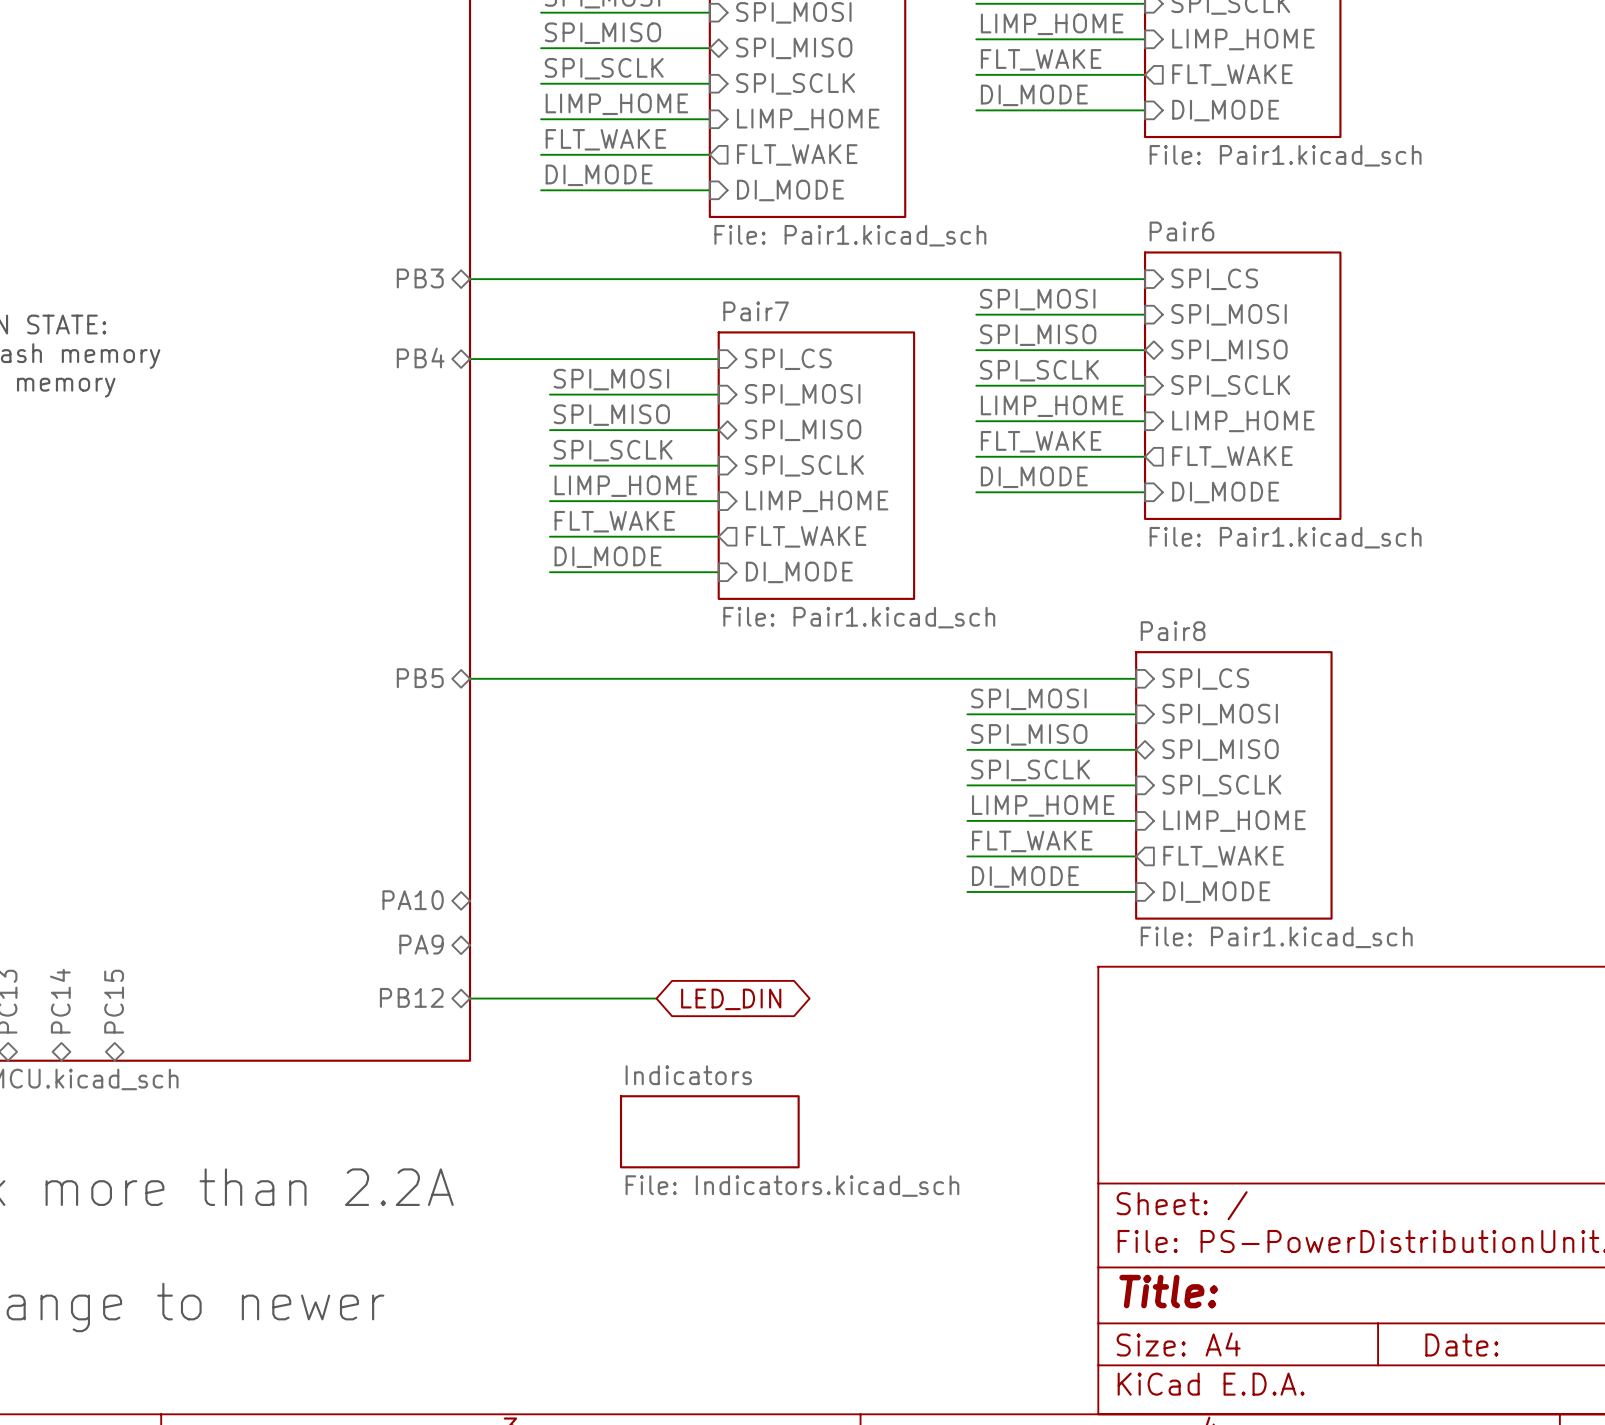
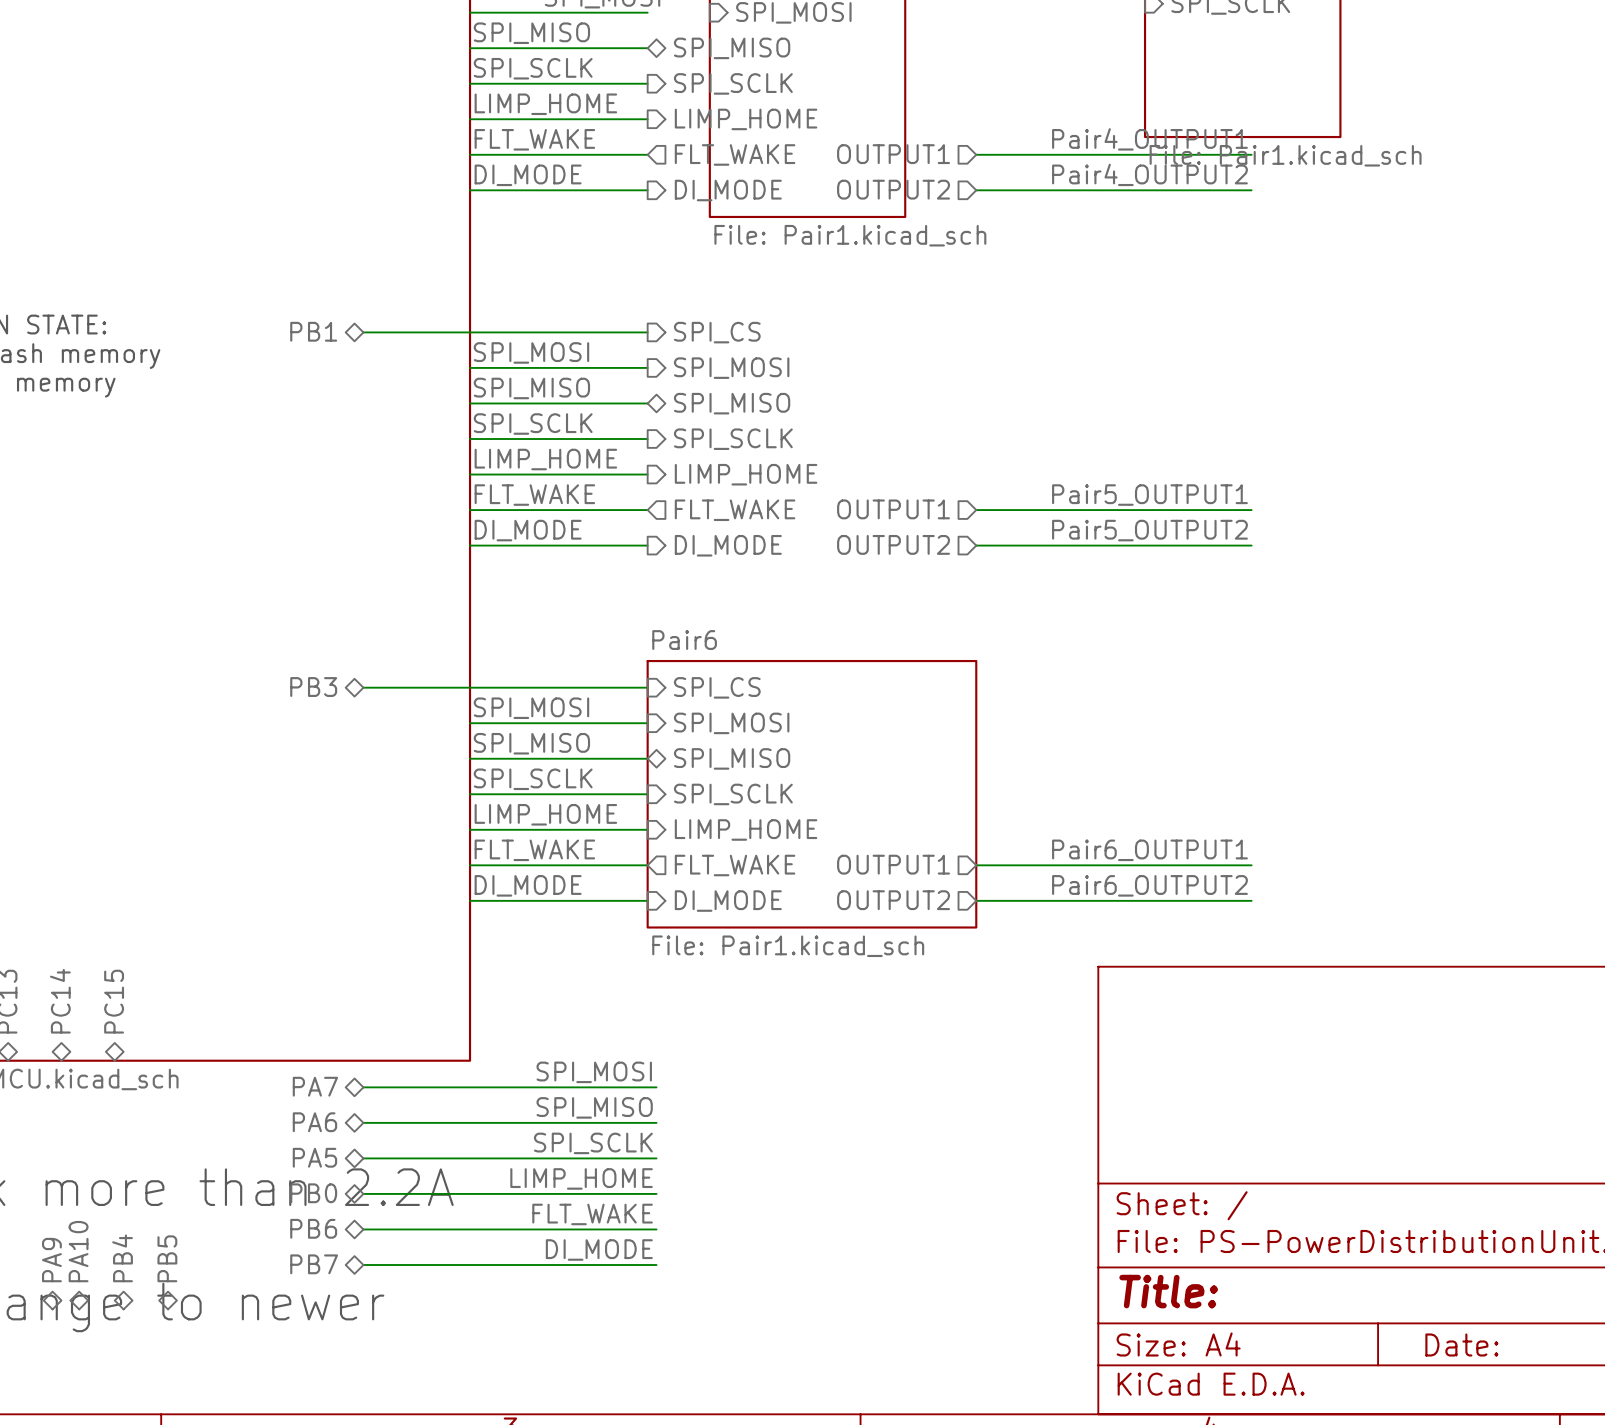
wire: (976, 3) (1145, 3) -> none
wire: none -> (470, 12) (541, 12)
wire: (647, 12) (709, 12) -> none
label: LIMP_HOME (1052, 24) -> none
label position: SPI_MISO (602, 33) -> SPI_MISO (531, 33)
wire: (976, 39) (1145, 39) -> none
sheet pin: LIMP_HOME (1243, 39) -> none
wire: none -> (470, 48) (541, 48)
wire: (647, 48) (709, 48) -> none
sheet pin position: SPI_MISO (794, 48) -> SPI_MISO (732, 48)
label: FLT_WAKE (1041, 59) -> none
label position: SPI_SCLK (604, 68) -> SPI_SCLK (533, 68)
wire: (976, 74) (1145, 74) -> none
sheet pin: FLT_WAKE (1232, 75) -> none
wire: none -> (470, 83) (541, 83)
wire: (647, 83) (709, 83) -> none
sheet pin position: SPI_SCLK (795, 83) -> SPI_SCLK (733, 83)
label: DI_MODE (1034, 95) -> none
label position: LIMP_HOME (616, 104) -> LIMP_HOME (545, 104)
wire: (976, 110) (1145, 110) -> none
sheet pin: DI_MODE (1225, 110) -> none
wire: none -> (470, 119) (541, 119)
wire: (647, 119) (709, 119) -> none
sheet pin position: LIMP_HOME (808, 119) -> LIMP_HOME (746, 119)
label position: FLT_WAKE (605, 139) -> FLT_WAKE (534, 139)
label: none -> Pair4_OUTPUT1 (1149, 139)
wire: none -> (470, 154) (541, 154)
wire: (647, 154) (709, 154) -> none
sheet pin position: FLT_WAKE (797, 154) -> FLT_WAKE (735, 154)
sheet pin: none -> OUTPUT1 (893, 154)
wire: none -> (976, 154) (1251, 154)
label: none -> Pair4_OUTPUT2 (1149, 174)
label position: DI_MODE (599, 175) -> DI_MODE (528, 175)
sheet pin: none -> OUTPUT2 (893, 189)
wire: none -> (470, 190) (541, 190)
wire: (647, 190) (709, 190) -> none
sheet pin position: DI_MODE (790, 190) -> DI_MODE (728, 190)
wire: none -> (976, 190) (1251, 190)
sheet Pair6 name position: Pair6 (1181, 231) -> Pair6 (684, 640)
sheet Pair6 shape: [1143, 251, 1342, 521] -> [646, 659, 978, 929]
sheet pin: PB3 (420, 278) -> none
wire: (470, 279) (1145, 279) -> none
sheet pin: SPI_CS (1214, 279) -> none
label: SPI_MOSI (1037, 299) -> none
wire: (976, 314) (1145, 314) -> none
sheet pin: SPI_MOSI (1229, 314) -> none
sheet pin: none -> PB1 (313, 331)
wire: none -> (363, 332) (647, 332)
label: SPI_MISO (1038, 335) -> none
wire: (976, 350) (1145, 350) -> none
sheet pin: SPI_MISO (1229, 350) -> none
sheet pin: PB4 (420, 357) -> none
wire: (470, 359) (718, 359) -> none
sheet pin position: SPI_CS (788, 359) -> SPI_CS (717, 332)
wire: none -> (470, 367) (647, 367)
label: SPI_SCLK (1039, 370) -> none
label position: SPI_MOSI (611, 379) -> SPI_MOSI (531, 352)
wire: (976, 385) (1145, 385) -> none
sheet pin: SPI_SCLK (1230, 385) -> none
wire: (549, 394) (718, 394) -> none
sheet pin position: SPI_MOSI (802, 394) -> SPI_MOSI (731, 368)
wire: none -> (470, 403) (647, 403)
label: LIMP_HOME (1052, 406) -> none
label position: SPI_MISO (611, 415) -> SPI_MISO (531, 388)
wire: (976, 421) (1145, 421) -> none
sheet pin: LIMP_HOME (1243, 421) -> none
wire: (549, 430) (718, 430) -> none
sheet pin position: SPI_MISO (803, 430) -> SPI_MISO (732, 403)
wire: none -> (470, 439) (647, 439)
label: FLT_WAKE (1041, 441) -> none
label position: SPI_SCLK (613, 450) -> SPI_SCLK (533, 423)
wire: (976, 456) (1145, 456) -> none
sheet pin: FLT_WAKE (1232, 456) -> none
wire: (549, 465) (718, 465) -> none
sheet pin position: SPI_SCLK (804, 465) -> SPI_SCLK (733, 439)
sheet Pair7: File: Pair1.kicad_sch (816, 465) -> none
wire: none -> (470, 474) (647, 474)
label: DI_MODE (1034, 477) -> none
label position: LIMP_HOME (625, 486) -> LIMP_HOME (545, 459)
wire: (976, 492) (1145, 492) -> none
sheet pin: DI_MODE (1225, 492) -> none
label: none -> Pair5_OUTPUT1 (1149, 495)
wire: (549, 501) (718, 501) -> none
sheet pin position: LIMP_HOME (817, 501) -> LIMP_HOME (746, 474)
sheet pin: none -> OUTPUT1 (893, 509)
wire: none -> (470, 510) (647, 510)
wire: none -> (976, 510) (1251, 510)
label position: FLT_WAKE (614, 521) -> FLT_WAKE (534, 495)
label: none -> Pair5_OUTPUT2 (1149, 530)
wire: (549, 536) (718, 536) -> none
sheet pin position: FLT_WAKE (806, 536) -> FLT_WAKE (735, 510)
sheet Pair6 value position: File: Pair1.kicad_sch (1285, 537) -> File: Pair1.kicad_sch (788, 946)
sheet pin: none -> OUTPUT2 (893, 544)
wire: none -> (470, 545) (647, 545)
wire: none -> (976, 545) (1251, 545)
label position: DI_MODE (608, 557) -> DI_MODE (528, 530)
wire: (549, 572) (718, 572) -> none
sheet pin position: DI_MODE (799, 572) -> DI_MODE (728, 545)
sheet pin: PB5 (420, 678) -> none
wire: (470, 678) (1136, 678) -> none
sheet pin: SPI_CS (1205, 678) -> none
sheet pin: none -> PB3 (313, 687)
wire: none -> (363, 687) (647, 687)
sheet pin: none -> SPI_CS (717, 687)
label: SPI_MOSI (1028, 699) -> none
label: none -> SPI_MOSI (531, 708)
wire: (967, 714) (1136, 714) -> none
sheet pin: SPI_MOSI (1220, 714) -> none
wire: none -> (470, 723) (647, 723)
sheet pin: none -> SPI_MOSI (731, 723)
label: SPI_MISO (1029, 734) -> none
label: none -> SPI_MISO (531, 743)
wire: (967, 749) (1136, 749) -> none
sheet pin: SPI_MISO (1220, 750) -> none
wire: none -> (470, 758) (647, 758)
sheet pin: none -> SPI_MISO (732, 758)
label: SPI_SCLK (1030, 770) -> none
label: none -> SPI_SCLK (533, 779)
wire: (967, 785) (1136, 785) -> none
sheet pin: SPI_SCLK (1221, 785) -> none
sheet Pair8: File: Pair1.kicad_sch (1233, 785) -> none
wire: none -> (470, 794) (647, 794)
sheet pin: none -> SPI_SCLK (733, 794)
label: LIMP_HOME (1043, 805) -> none
label: none -> LIMP_HOME (545, 814)
wire: (967, 820) (1136, 820) -> none
sheet pin: LIMP_HOME (1234, 821) -> none
wire: none -> (470, 829) (647, 829)
sheet pin: none -> LIMP_HOME (746, 829)
label: FLT_WAKE (1032, 841) -> none
label: none -> FLT_WAKE (534, 850)
label: none -> Pair6_OUTPUT1 (1149, 850)
wire: (967, 856) (1136, 856) -> none
sheet pin: FLT_WAKE (1223, 856) -> none
sheet pin: none -> OUTPUT1 (893, 864)
wire: none -> (470, 865) (647, 865)
sheet pin: none -> FLT_WAKE (735, 865)
wire: none -> (976, 865) (1251, 865)
label: DI_MODE (1025, 876) -> none
label: none -> DI_MODE (528, 885)
label: none -> Pair6_OUTPUT2 (1149, 885)
wire: (967, 891) (1136, 891) -> none
sheet pin: DI_MODE (1216, 892) -> none
sheet pin: PA10 (413, 900) -> none
wire: none -> (470, 900) (647, 900)
sheet pin: none -> OUTPUT2 (893, 900)
wire: none -> (976, 900) (1251, 900)
sheet pin: none -> DI_MODE (728, 901)
sheet pin: PA9 (421, 944) -> none
sheet pin: PB12 (411, 997) -> none
wire: (470, 998) (656, 998) -> none
global label: LED_DIN (731, 999) -> none
label: none -> SPI_MOSI (594, 1072)
sheet pin: none -> PA7 (315, 1086)
wire: none -> (363, 1087) (656, 1087)
label: none -> SPI_MISO (594, 1107)
sheet pin: none -> PA6 (314, 1122)
wire: none -> (363, 1122) (656, 1122)
sheet Indicators: File: Indicators.kicad_sch (709, 1131) -> none
label: none -> SPI_SCLK (593, 1143)
sheet pin: none -> PA5 (314, 1157)
wire: none -> (363, 1158) (656, 1158)
label: none -> LIMP_HOME (581, 1178)
sheet pin: none -> PB0 (313, 1193)
wire: none -> (363, 1193) (656, 1193)
label: none -> FLT_WAKE (592, 1214)
sheet pin: none -> PB6 (313, 1228)
wire: none -> (363, 1229) (656, 1229)
label: none -> DI_MODE (599, 1249)
sheet pin: none -> PA10 (78, 1251)
sheet pin: none -> PB4 (122, 1258)
sheet pin: none -> PB5 (167, 1258)
sheet pin: none -> PA9 (51, 1260)
sheet pin: none -> PB7 (314, 1264)
wire: none -> (363, 1264) (656, 1264)

